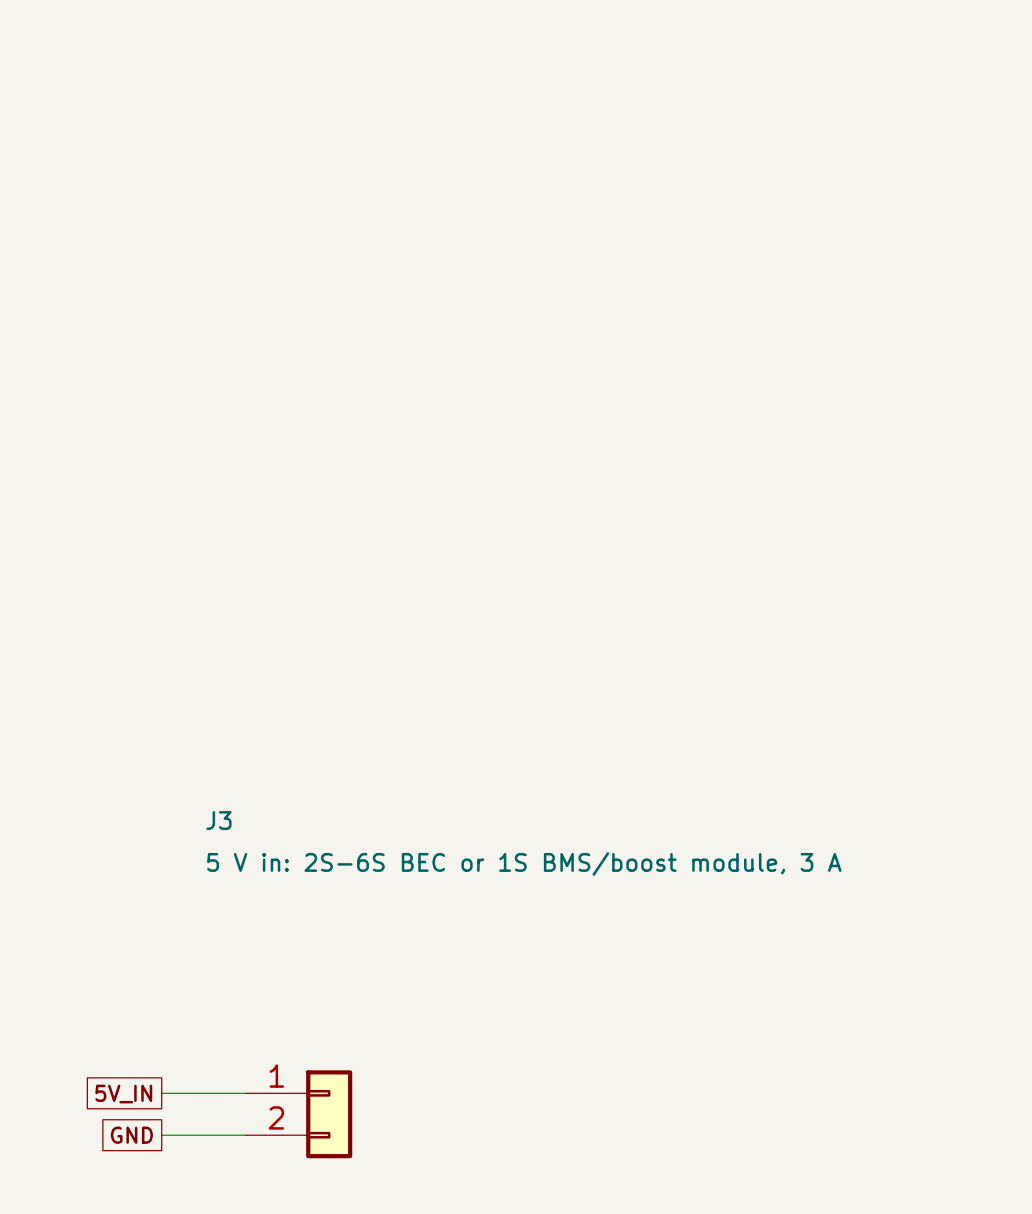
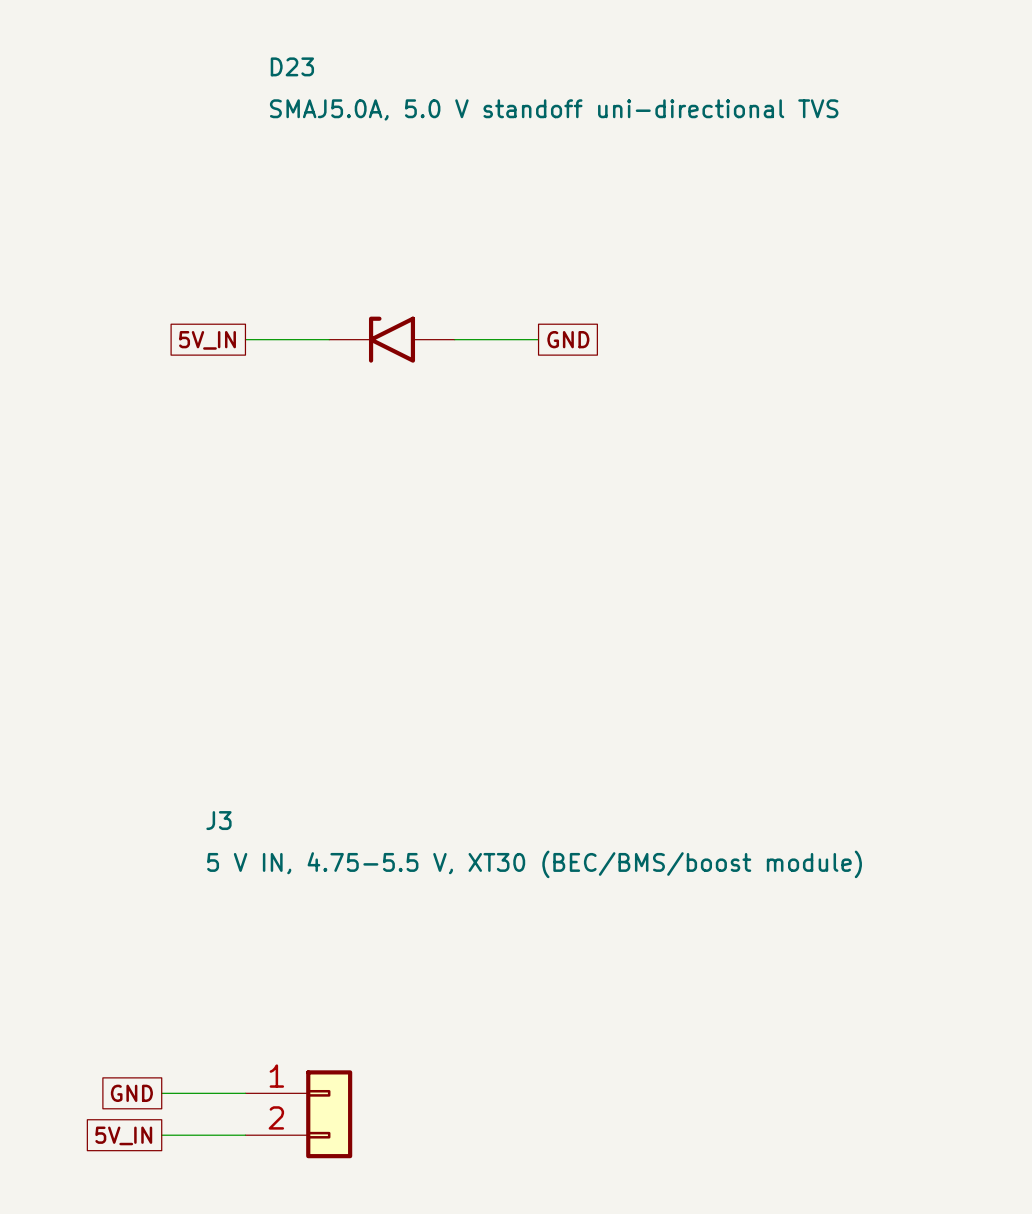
wire: none -> (245, 339) (329, 339)
D23: none -> SMAJ5.0A, 5.0 V standoff uni-directional TVS (392, 339)
wire: none -> (454, 339) (538, 339)
global label: none -> GND (568, 339)
global label: none -> 5V_IN (207, 340)
J3 value: 5 V in: 2S-6S BEC or 1S BMS/boost module, 3 A (524, 864) -> 5 V IN, 4.75-5.5 V, XT30 (BEC/BMS/boost module) (534, 864)
global label: 5V_IN (123, 1094) -> GND (131, 1093)
global label: GND (131, 1135) -> 5V_IN (123, 1135)

